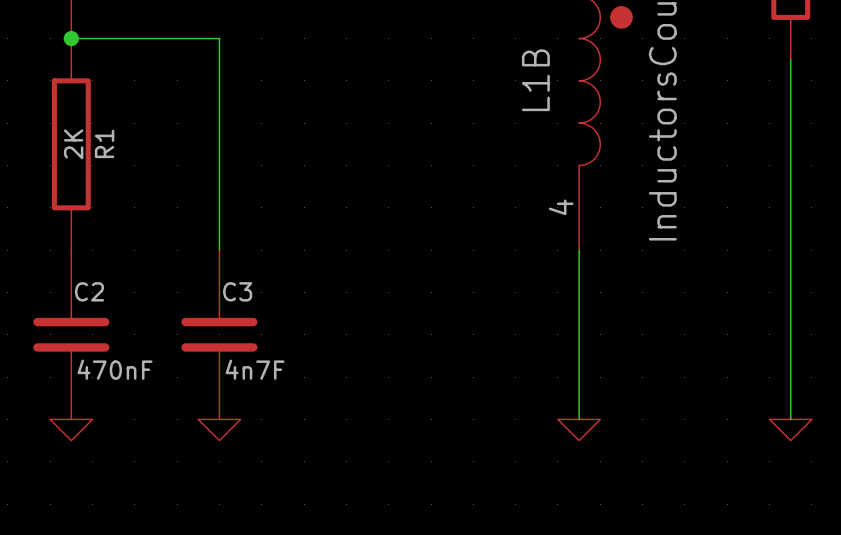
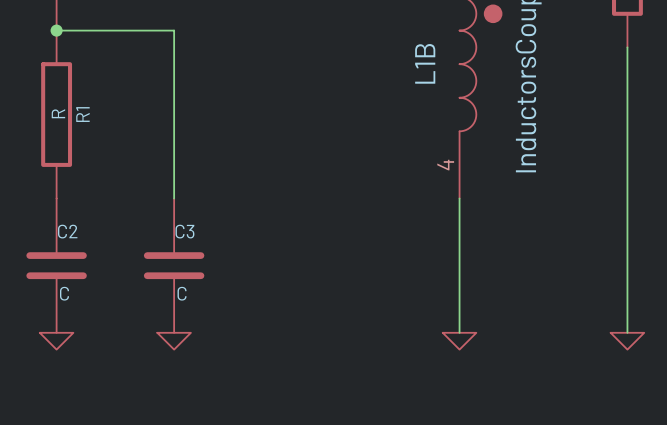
R1 value: 2K (73, 144) -> R (58, 113)
C2 value: 470nF (115, 369) -> C (64, 293)
C3 value: 4n7F (255, 369) -> C (182, 293)

